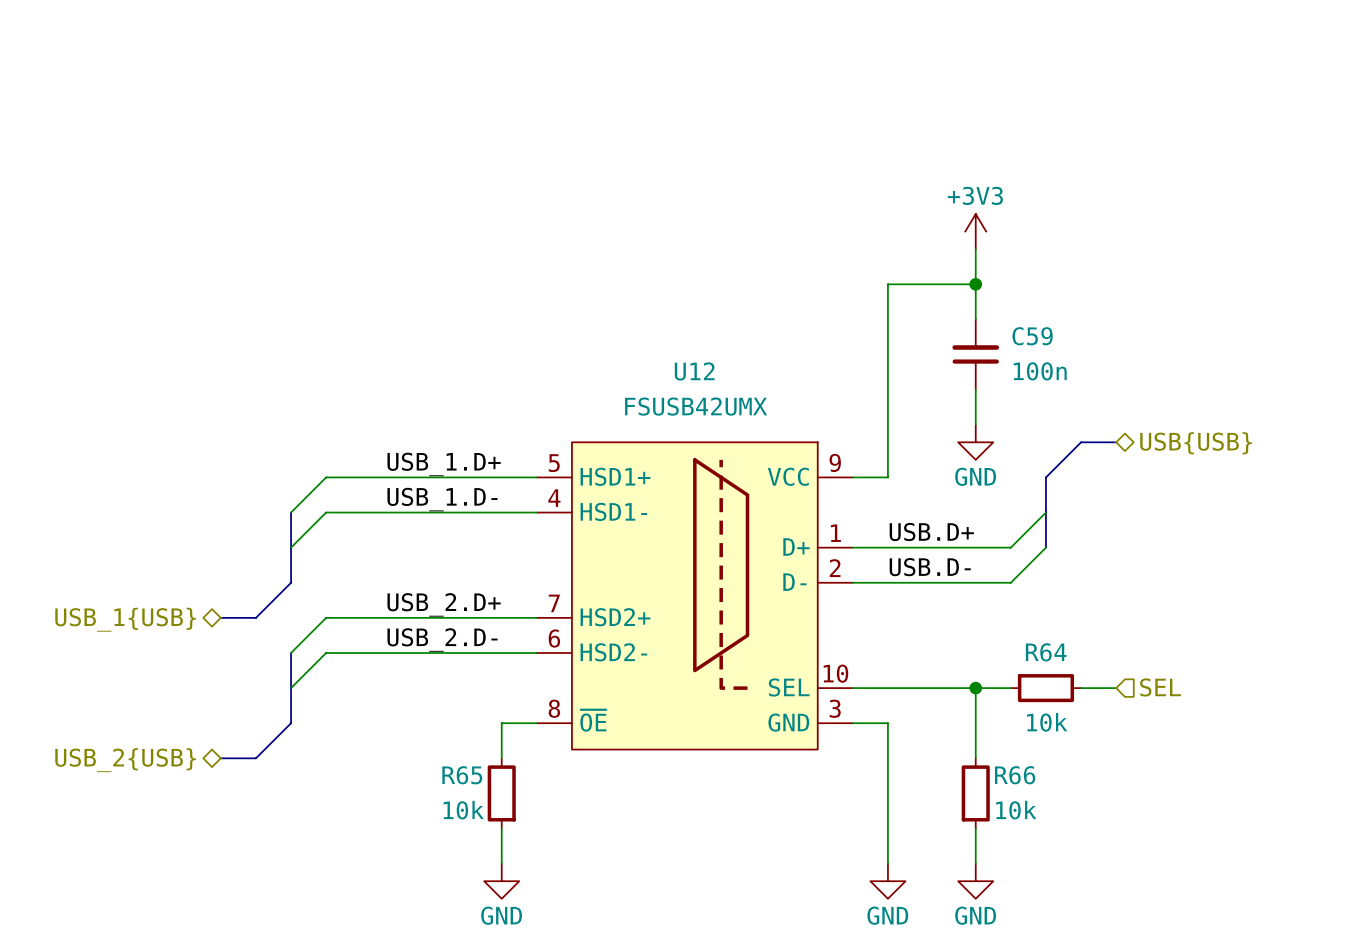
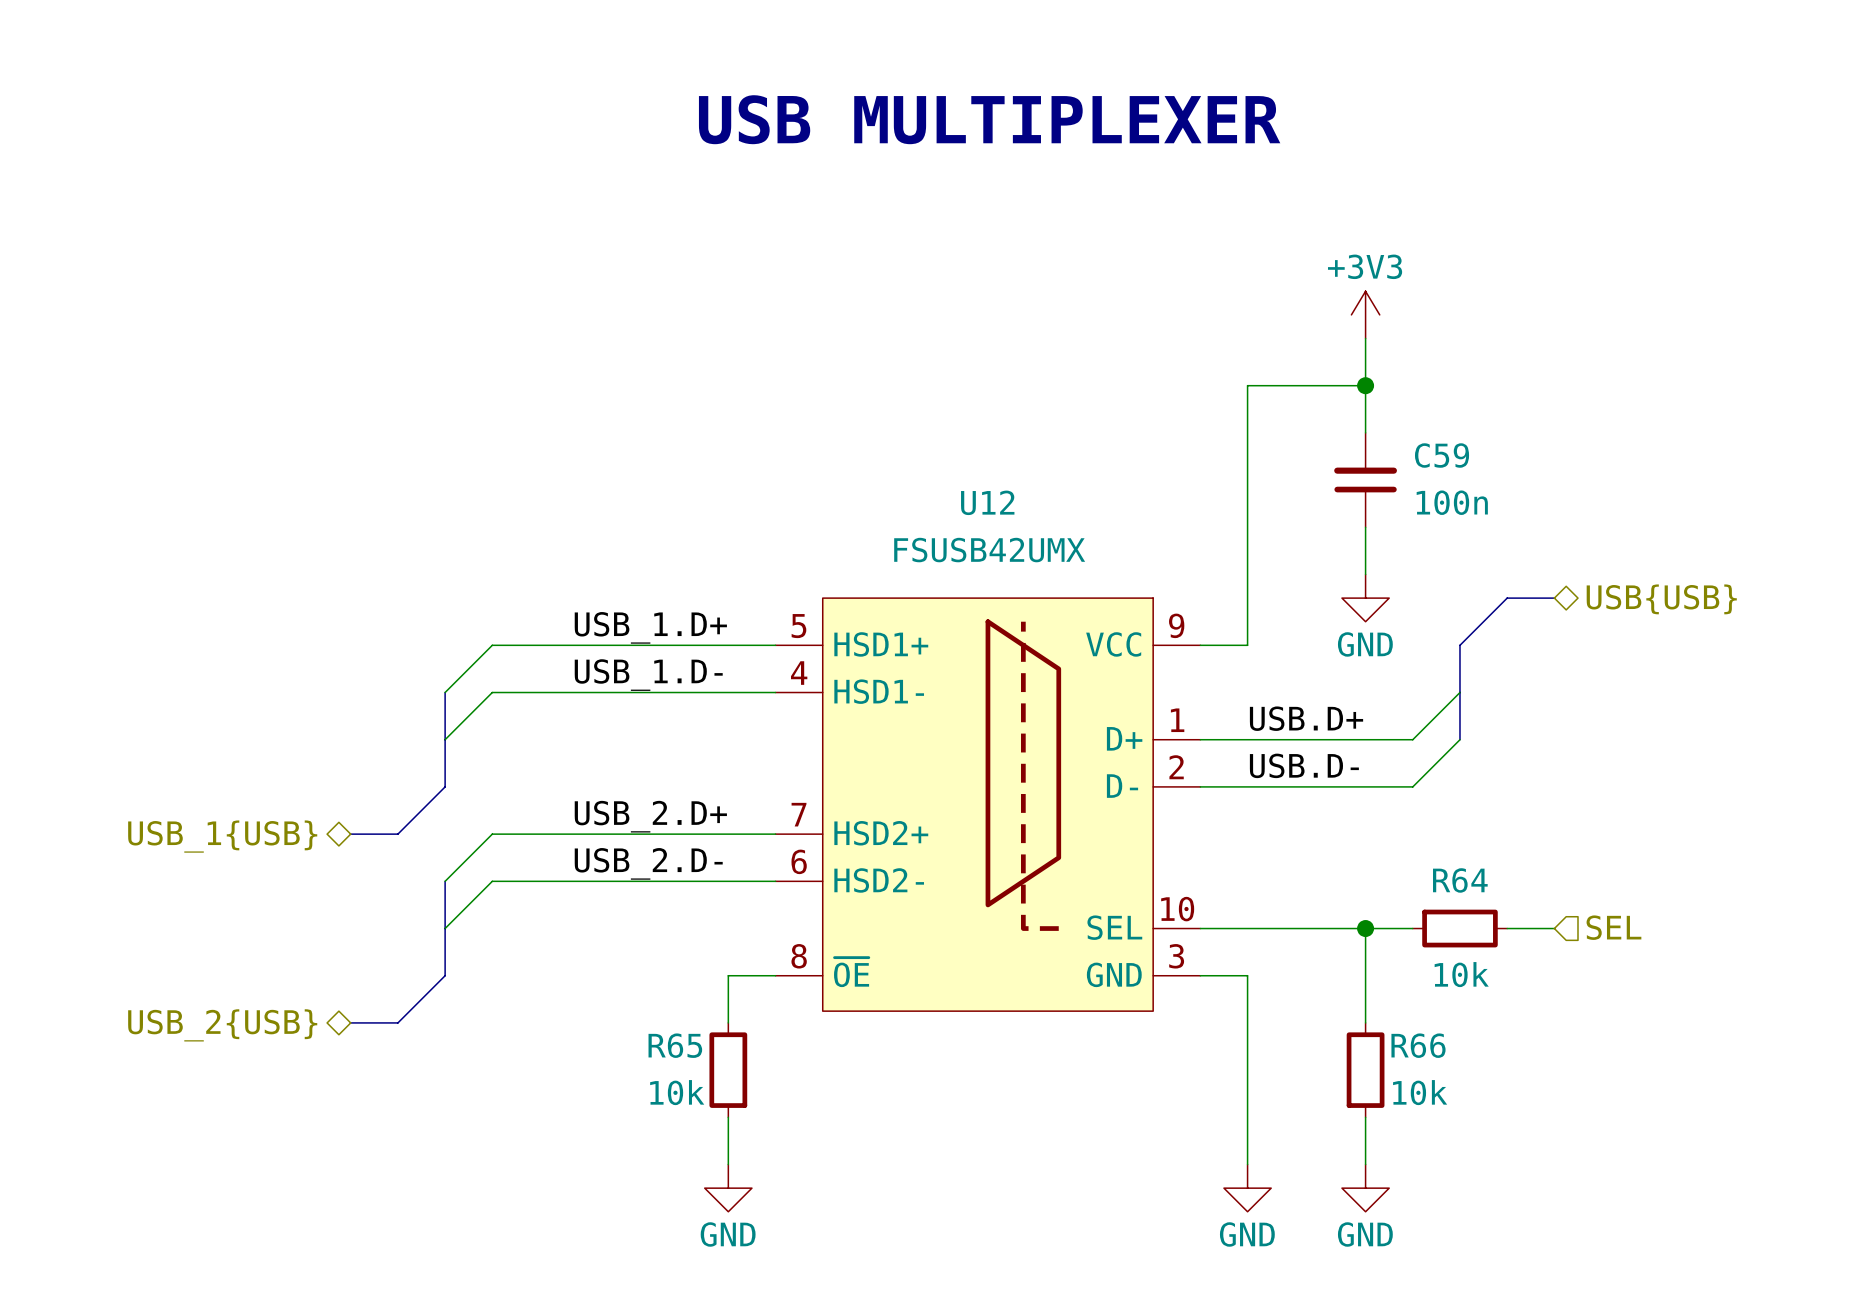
text: none -> USB MULTIPLEXER (989, 119)

